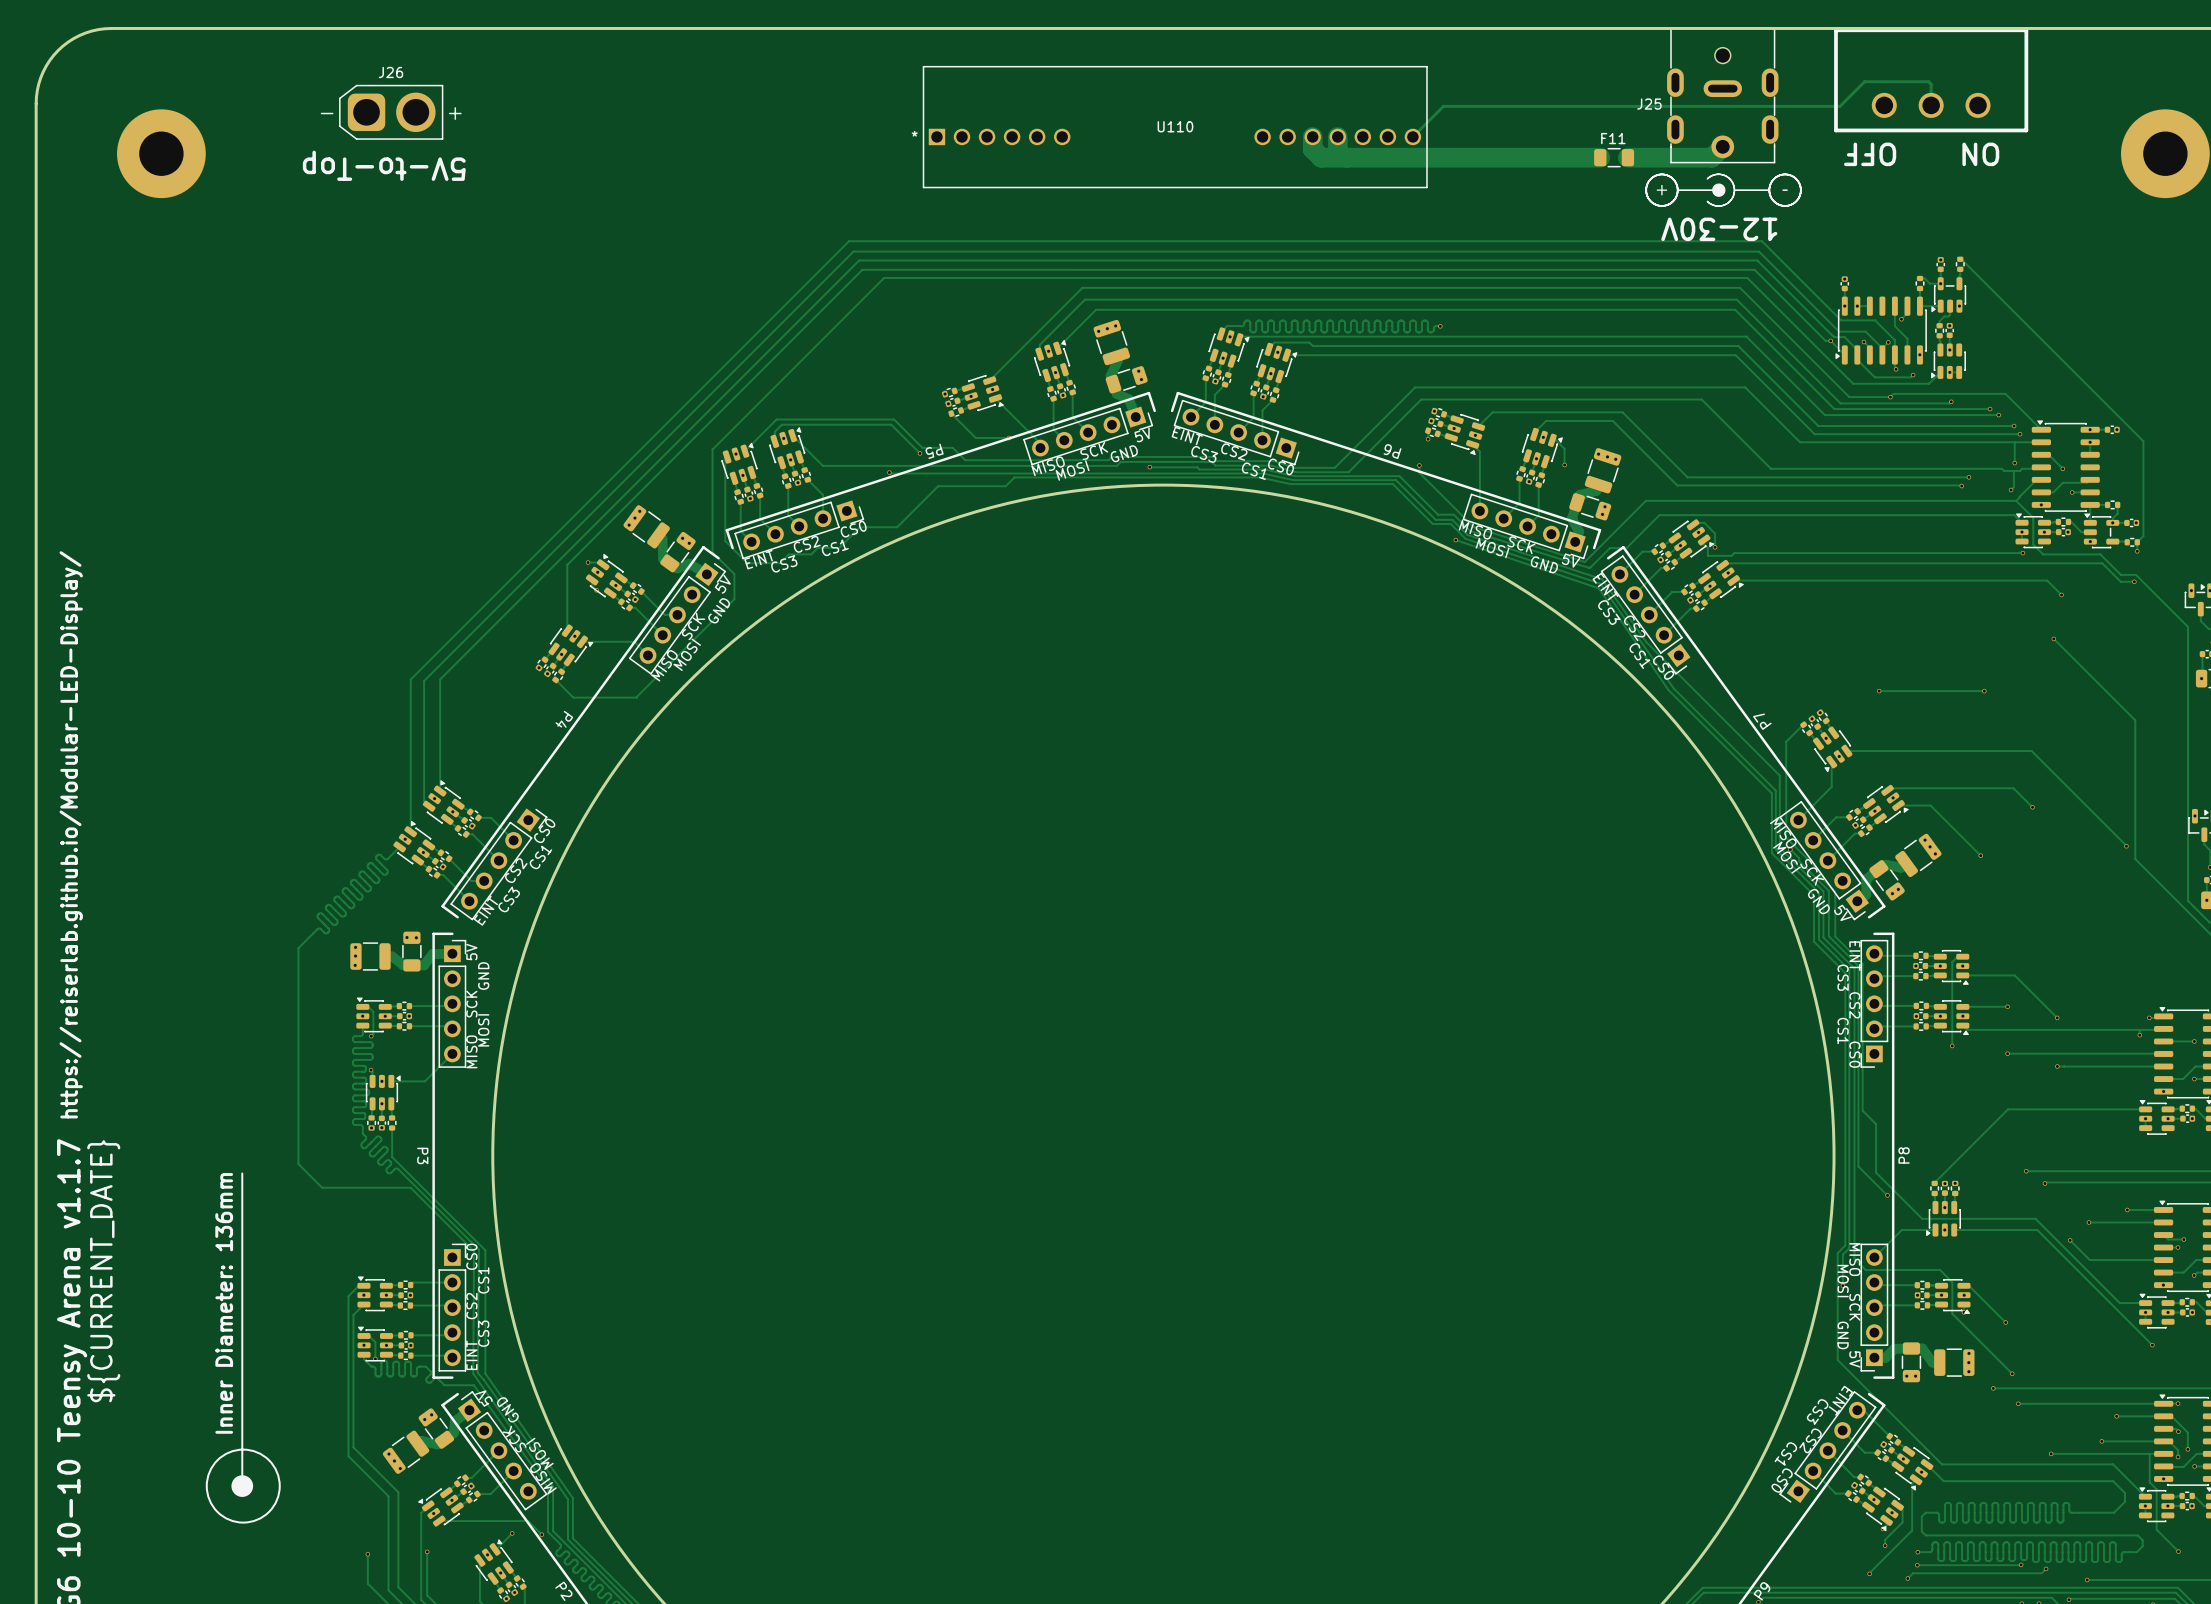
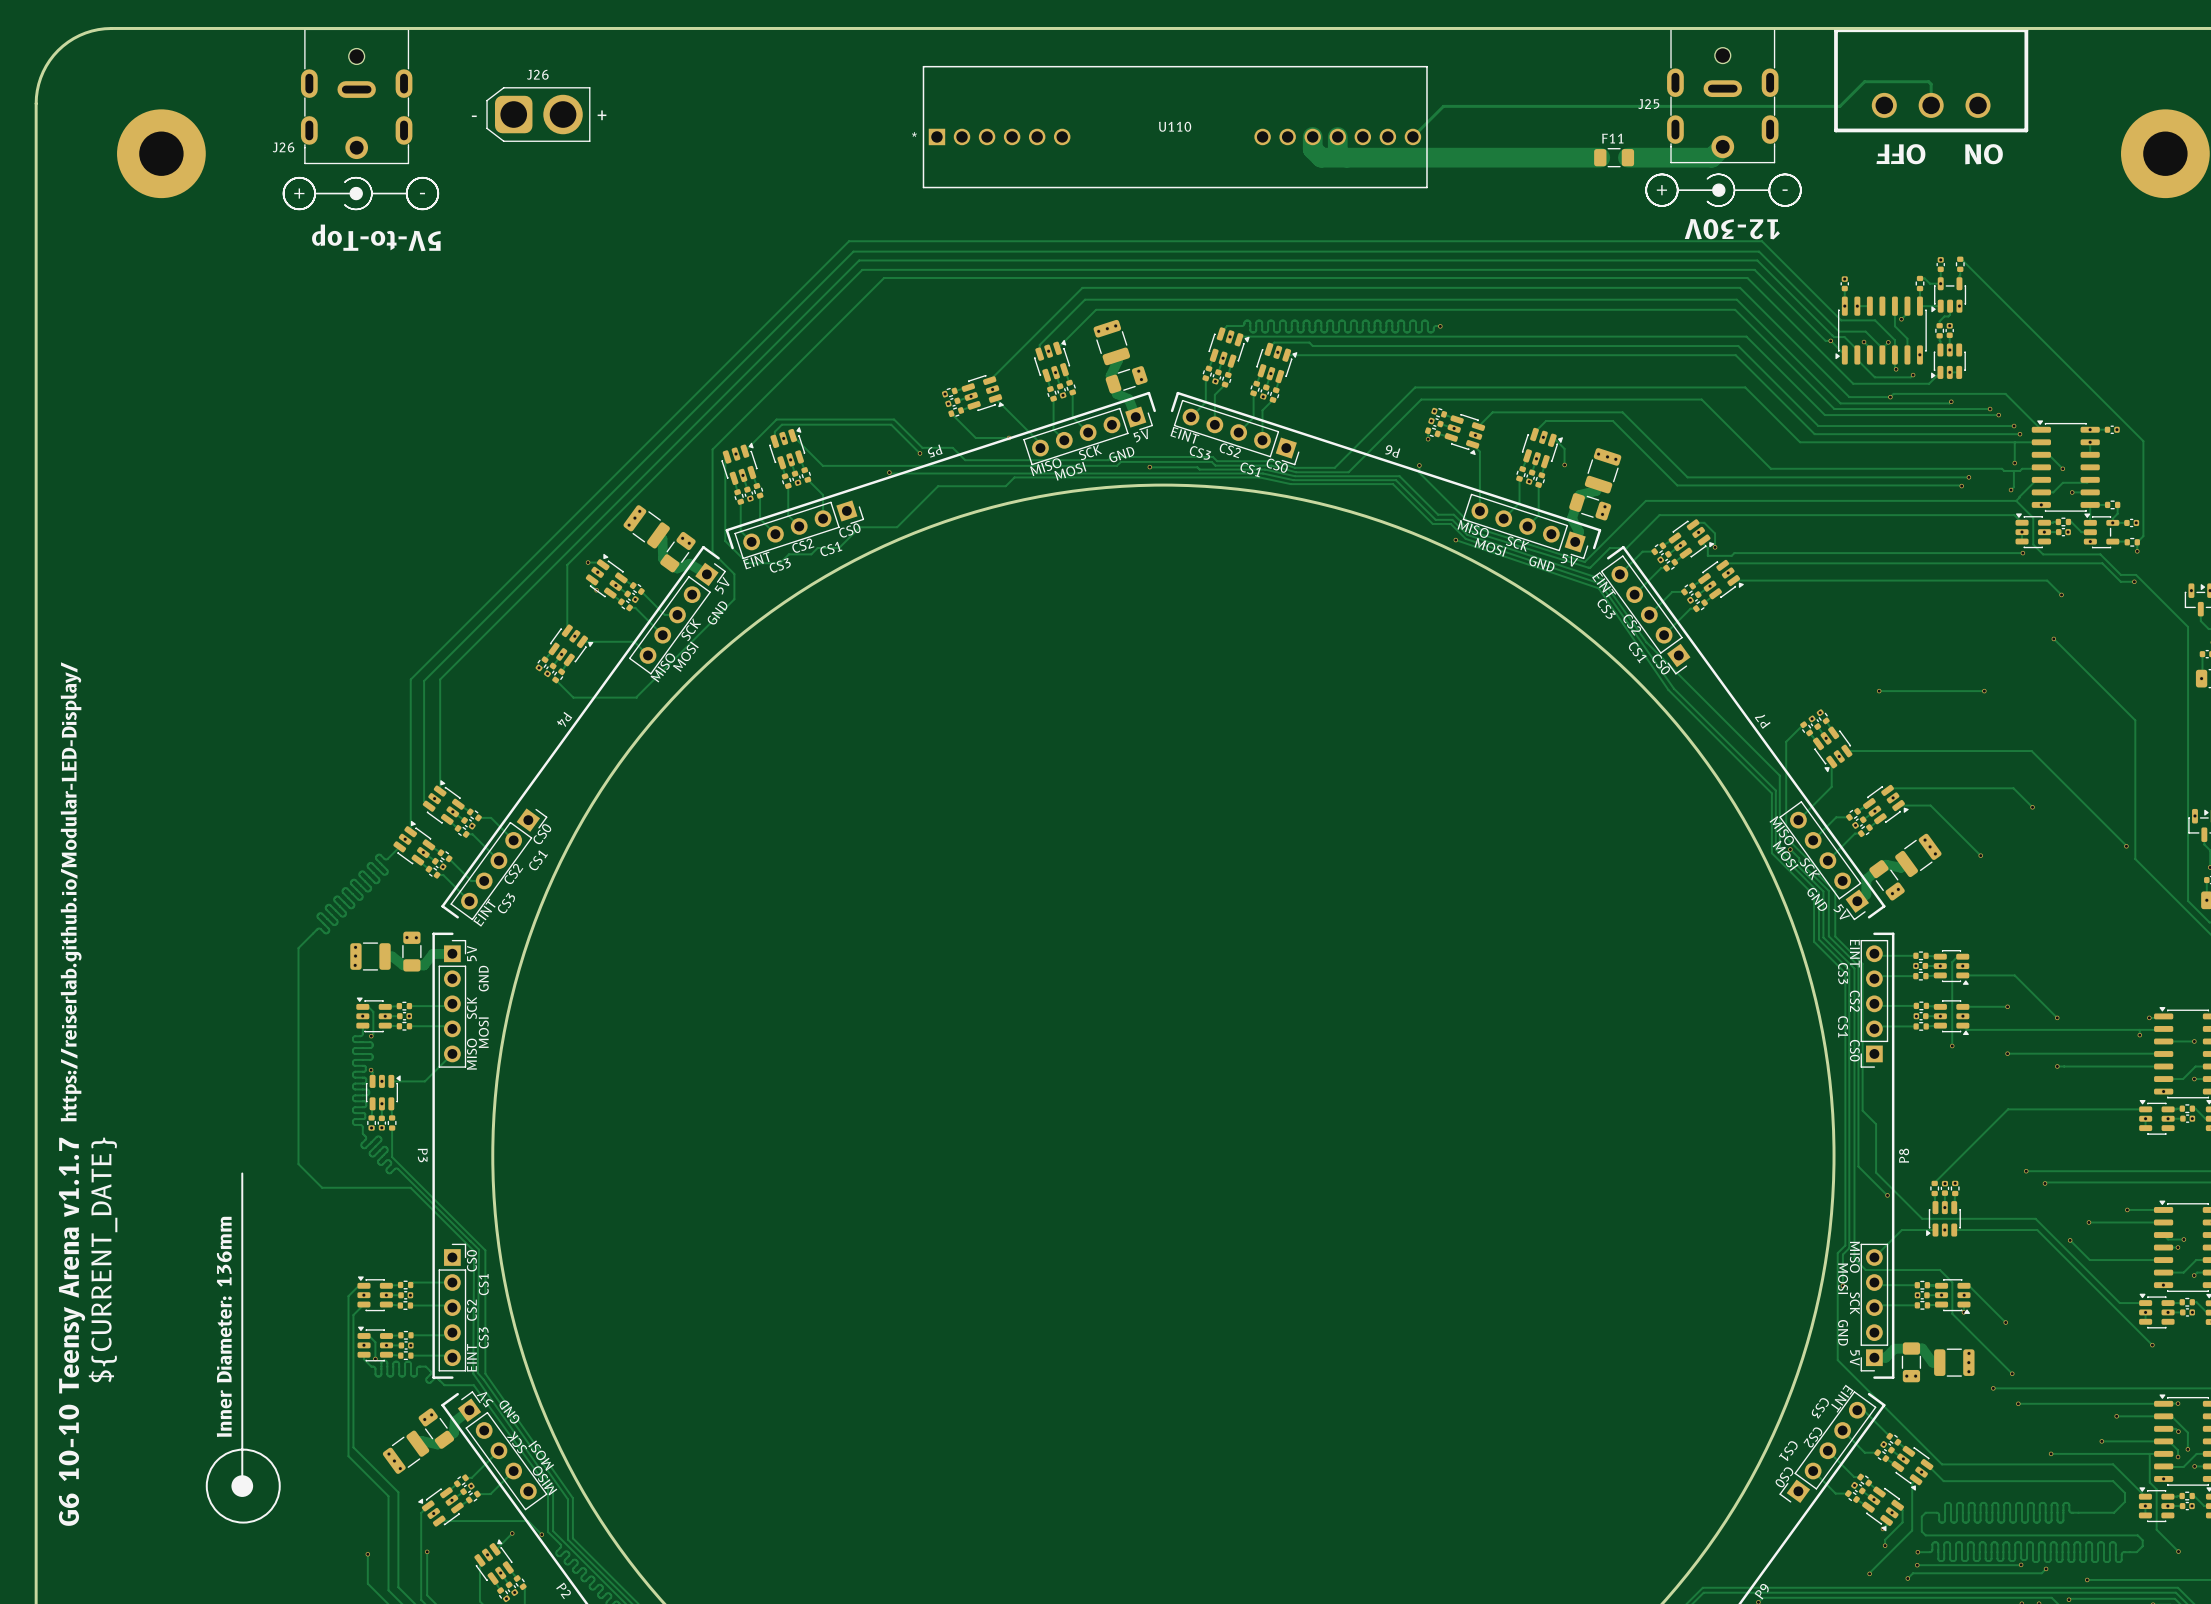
J26: none -> (356, 96)
J26 position: (391, 112) -> (538, 114)
text position: 5V-to-Top (384, 165) -> 5V-to-Top (376, 237)
line: none -> (298, 177) (287, 182) (283, 194) (288, 205) (300, 209) (311, 204) (315, 192) (309, 181) (298, 177)
line: none -> (421, 177) (410, 182) (406, 194) (411, 205) (423, 209) (434, 204) (438, 192) (433, 181) (421, 177)
line: none -> (344, 182) (352, 177) (361, 178) (369, 184) (371, 193) (369, 202) (361, 208) (352, 209) (344, 204)
drawing: none -> [349, 186, 363, 201]
drawing: none -> [294, 188, 305, 199]
drawing: none -> [419, 192, 426, 195]
line: none -> (315, 193) (349, 193)
line: none -> (372, 193) (406, 193)

